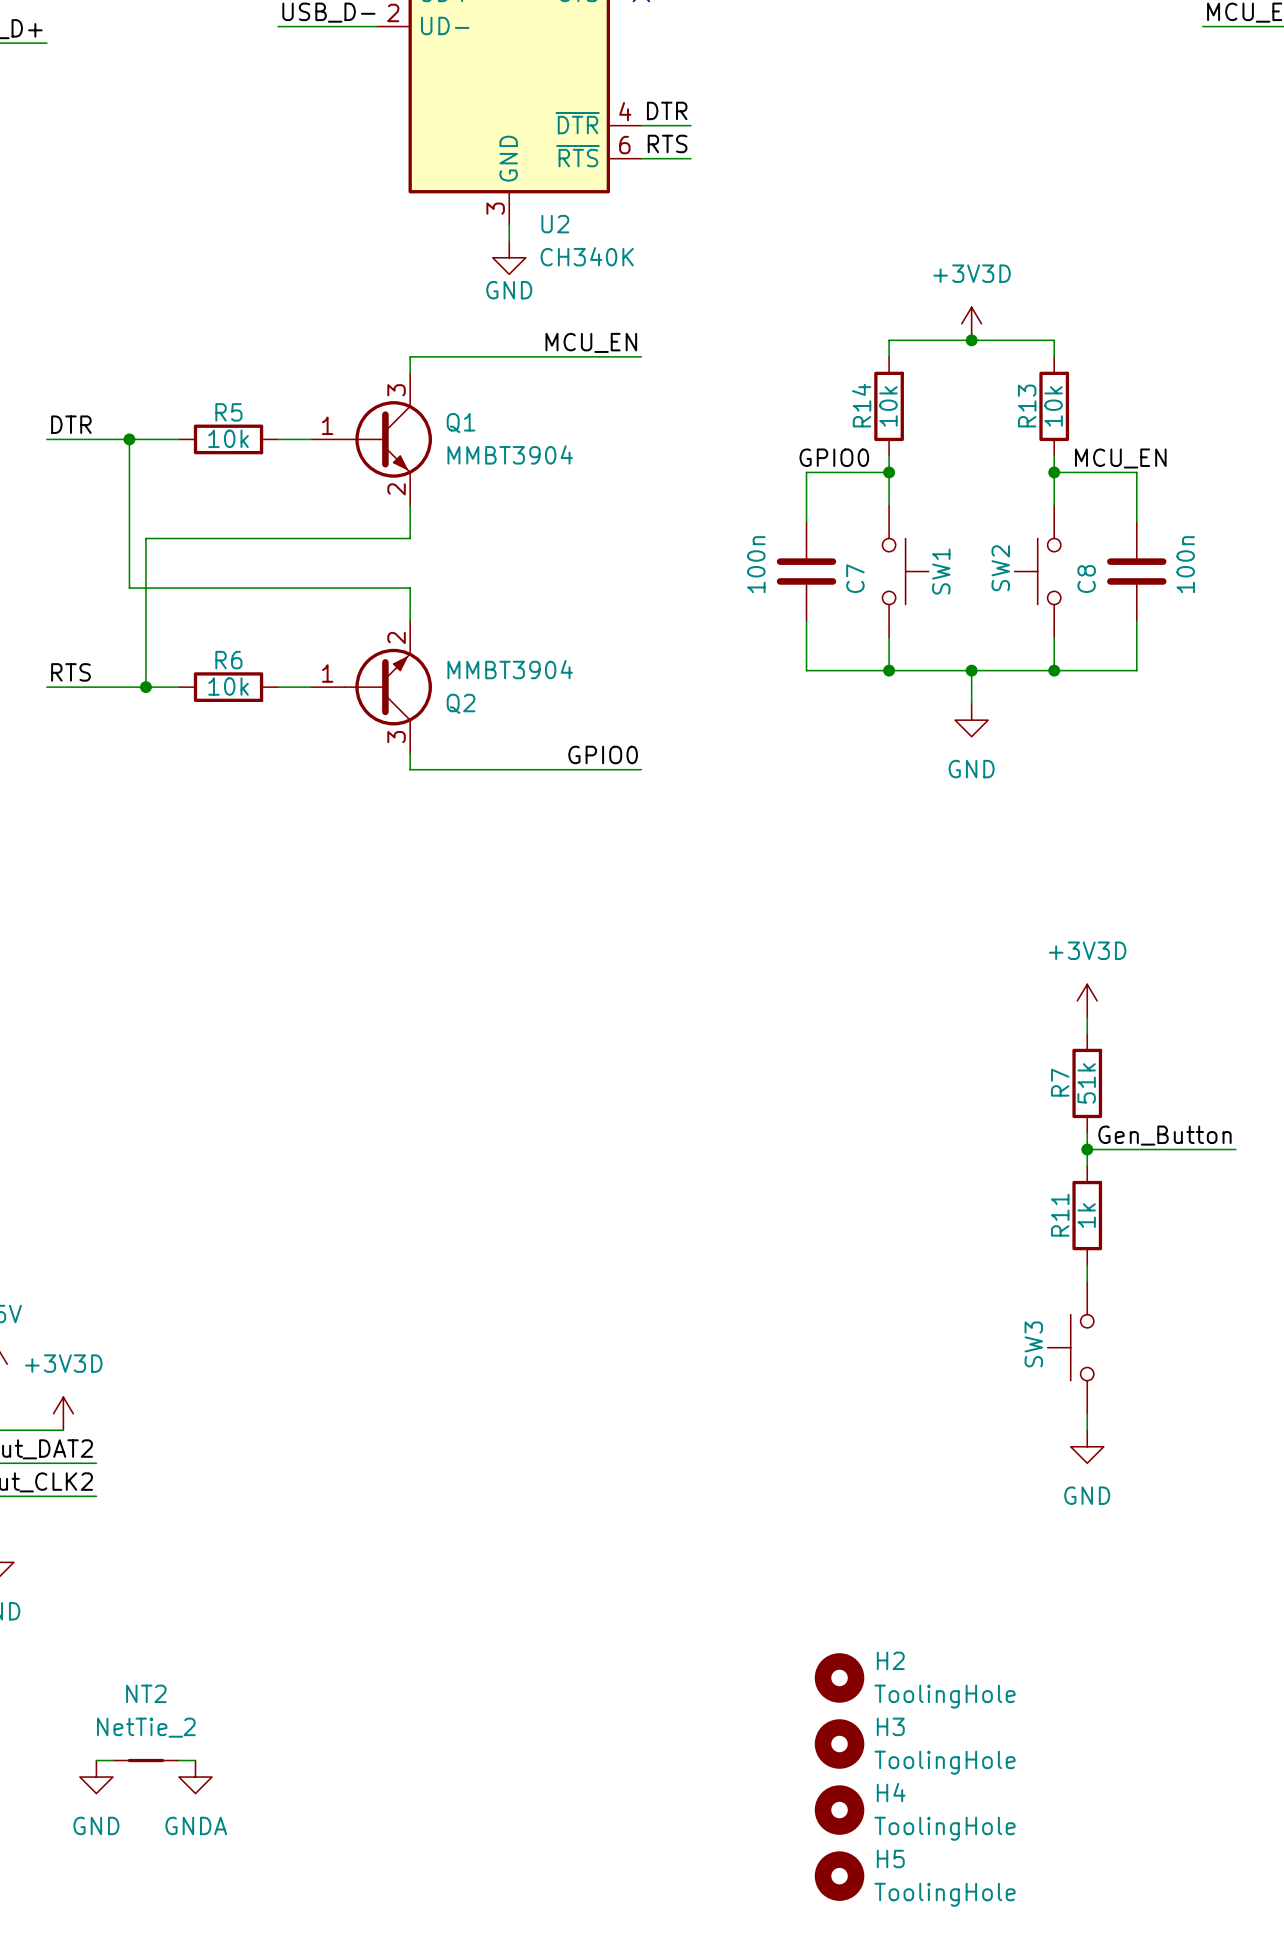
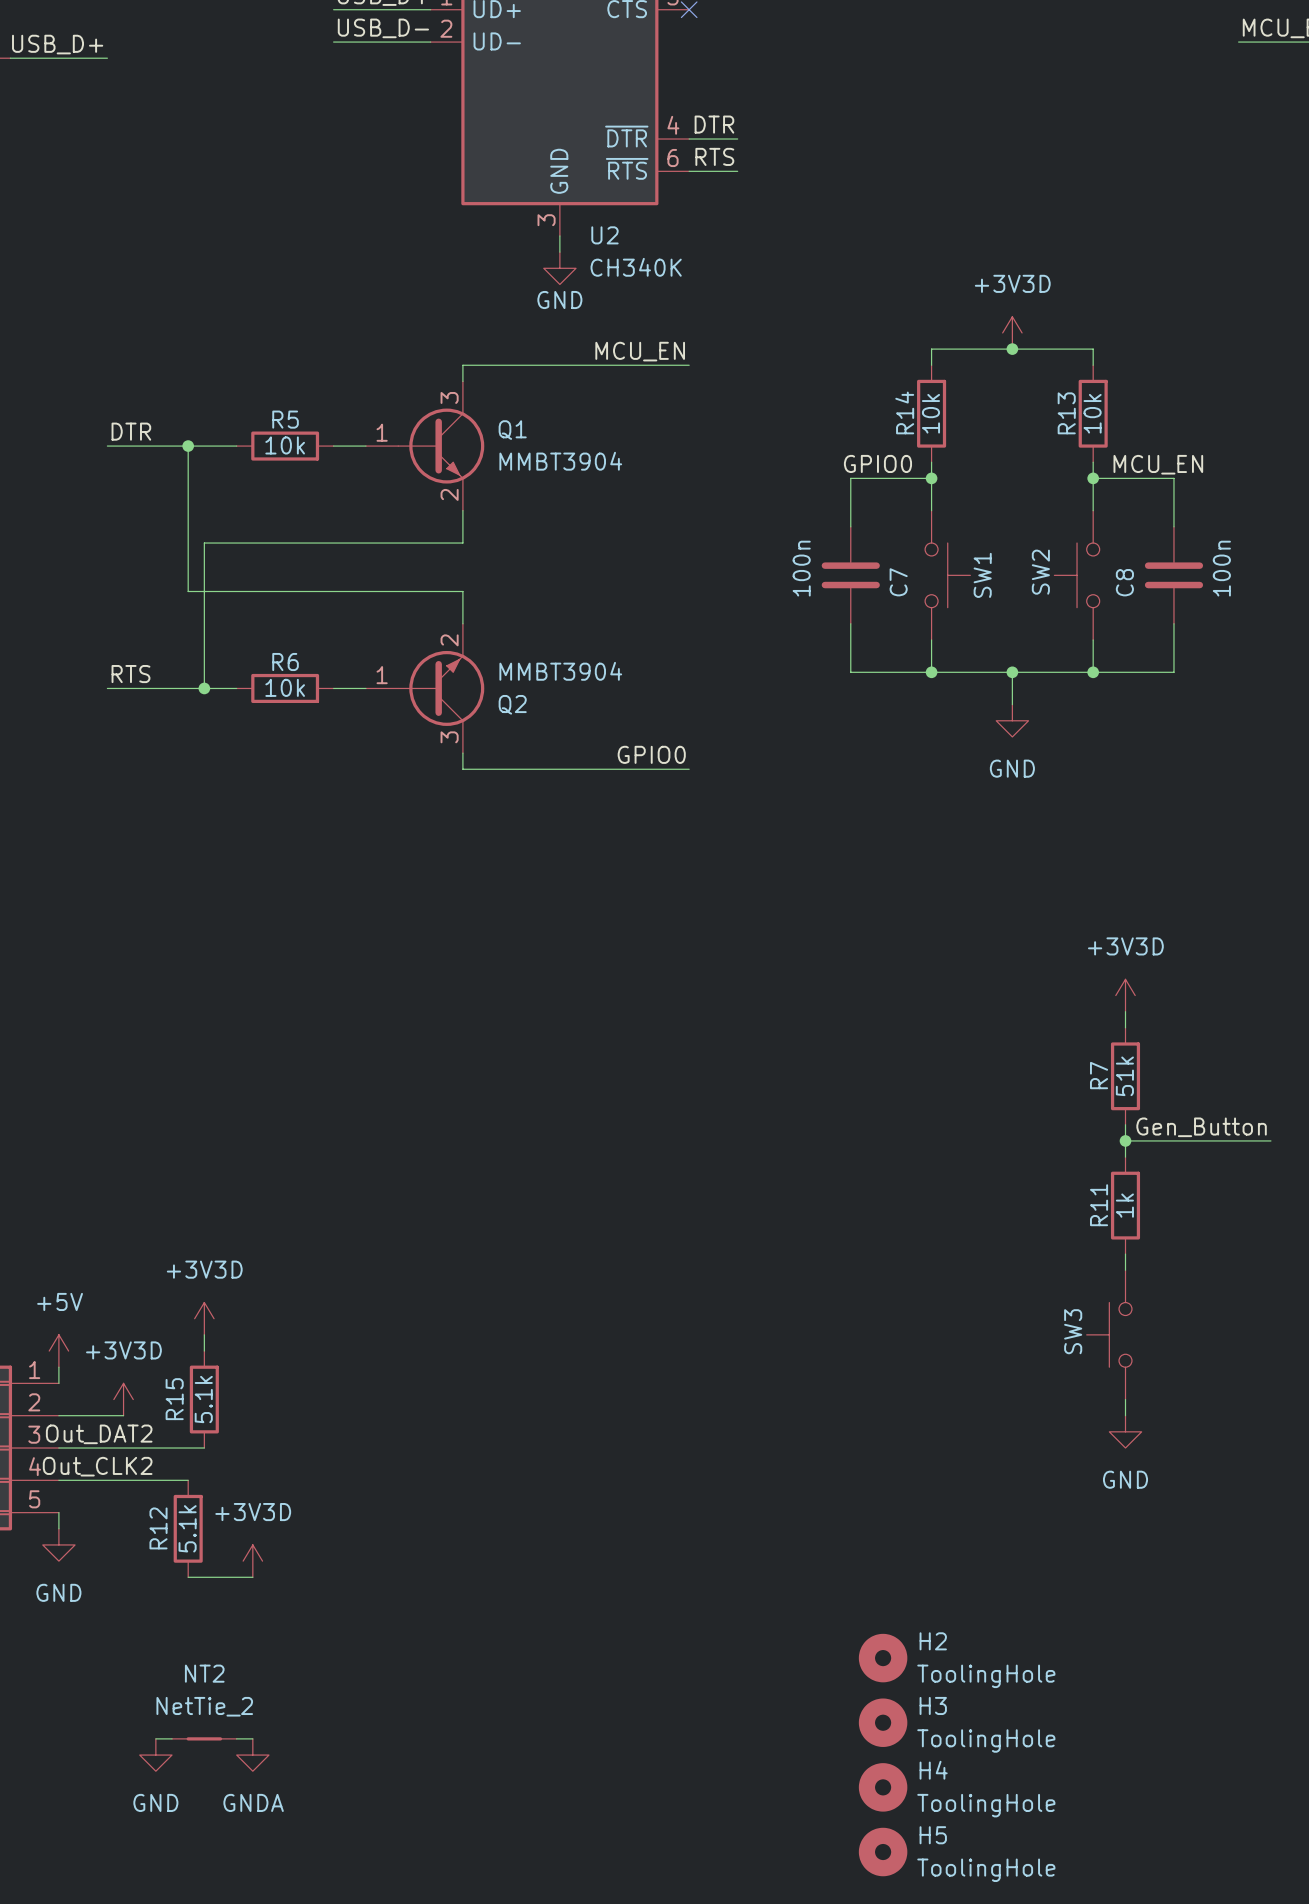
power symbol: none -> +3V3D (204, 1318)
wire: none -> (204, 1334) (204, 1351)
R15: none -> 5.1k (204, 1399)
wire: none -> (155, 1448) (204, 1448)
wire: none -> (155, 1480) (188, 1480)
R12: none -> 5.1k (188, 1528)
power symbol: none -> +3V3D (252, 1561)
wire: none -> (188, 1577) (252, 1577)

